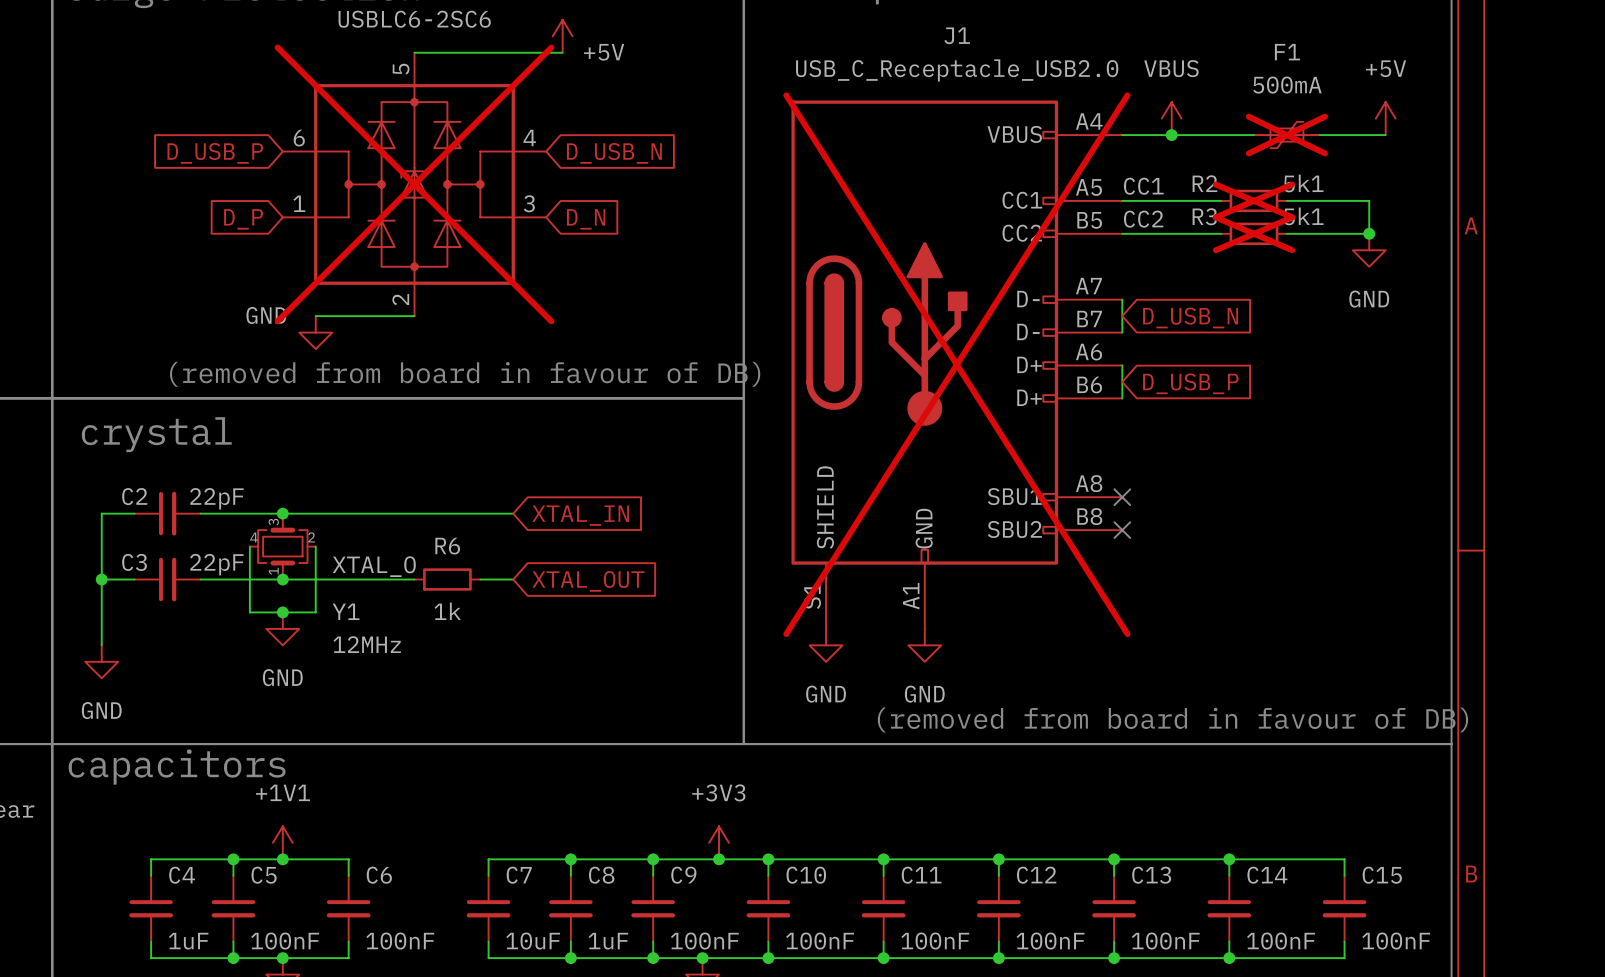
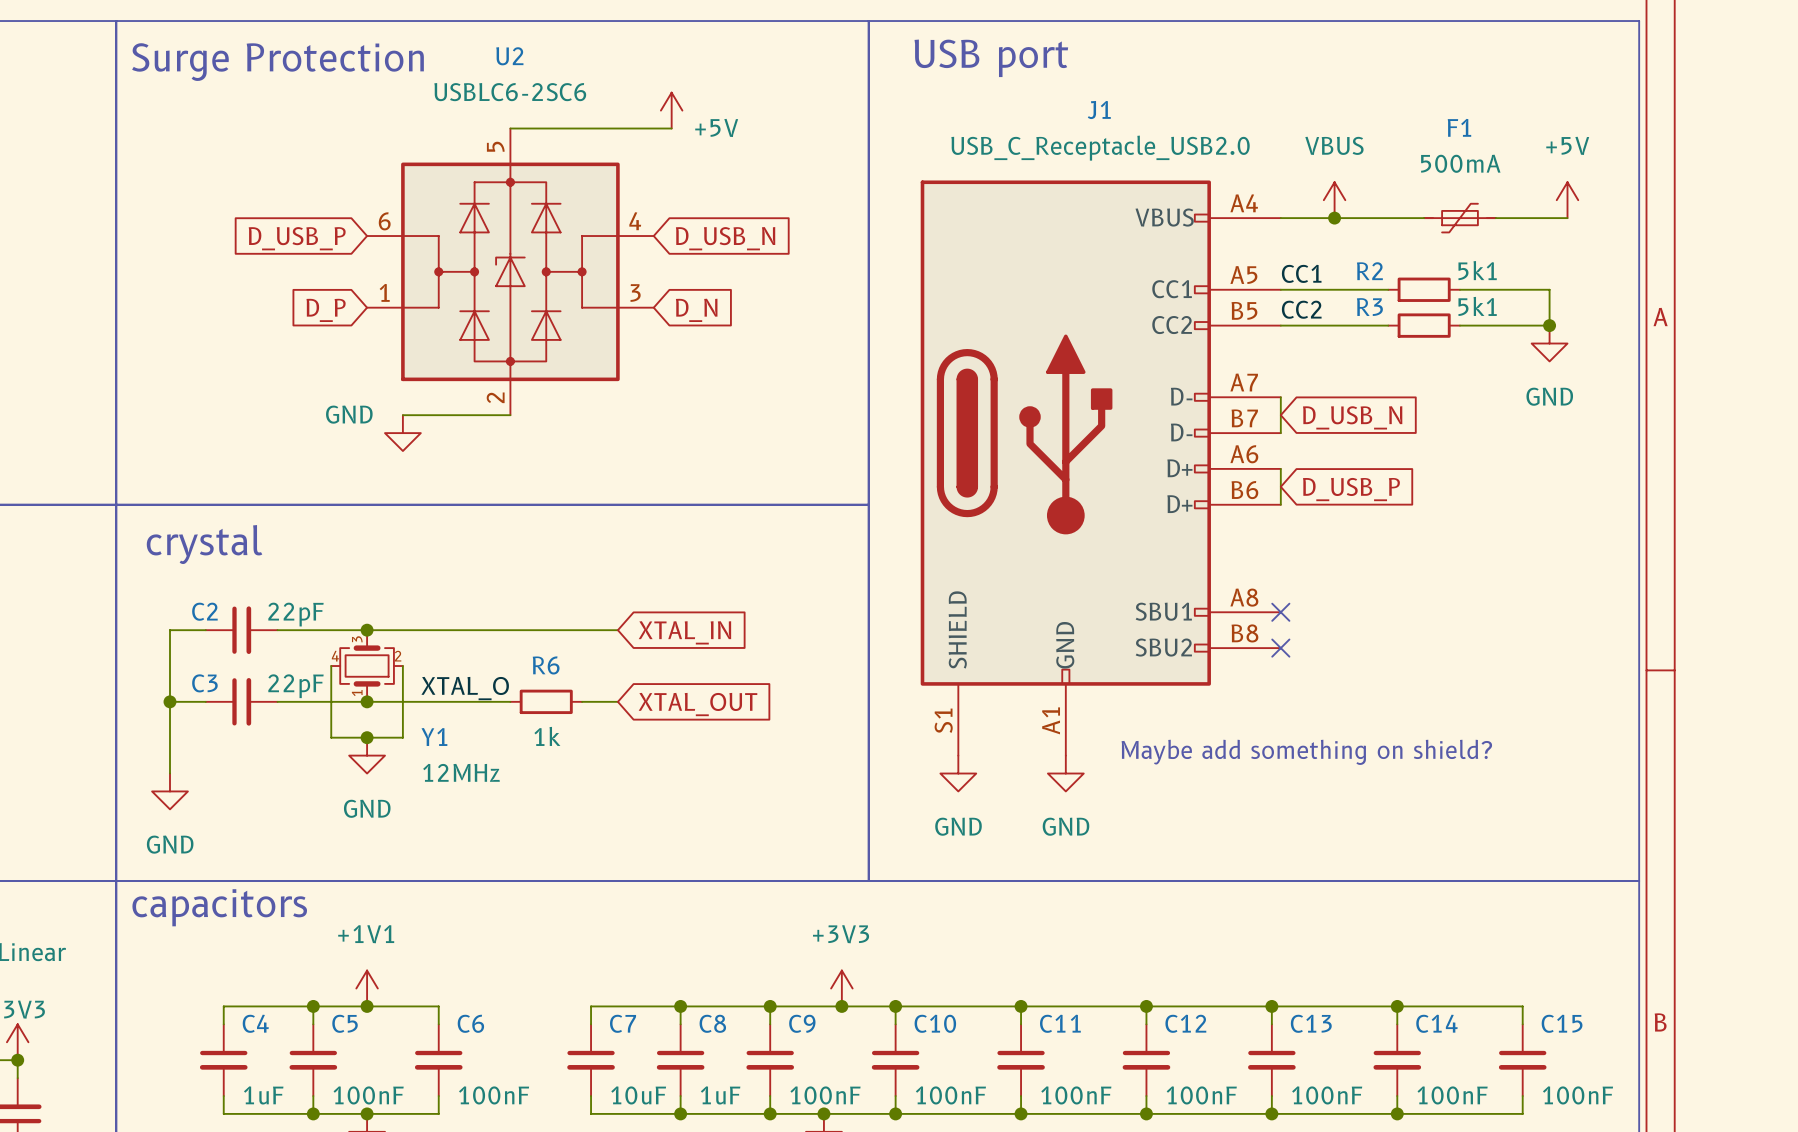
F1 do-not-place cross: (1286, 135) -> none
U2 do-not-place cross: (414, 184) -> none
R2 do-not-place cross: (1254, 200) -> none
R3 do-not-place cross: (1254, 233) -> none
J1 do-not-place cross: (956, 364) -> none
text: (removed from board in favour of DB) (465, 374) -> none
text: none -> Maybe add something on shield? (1306, 752)
text: (removed from board in favour of DB) (1172, 719) -> none

